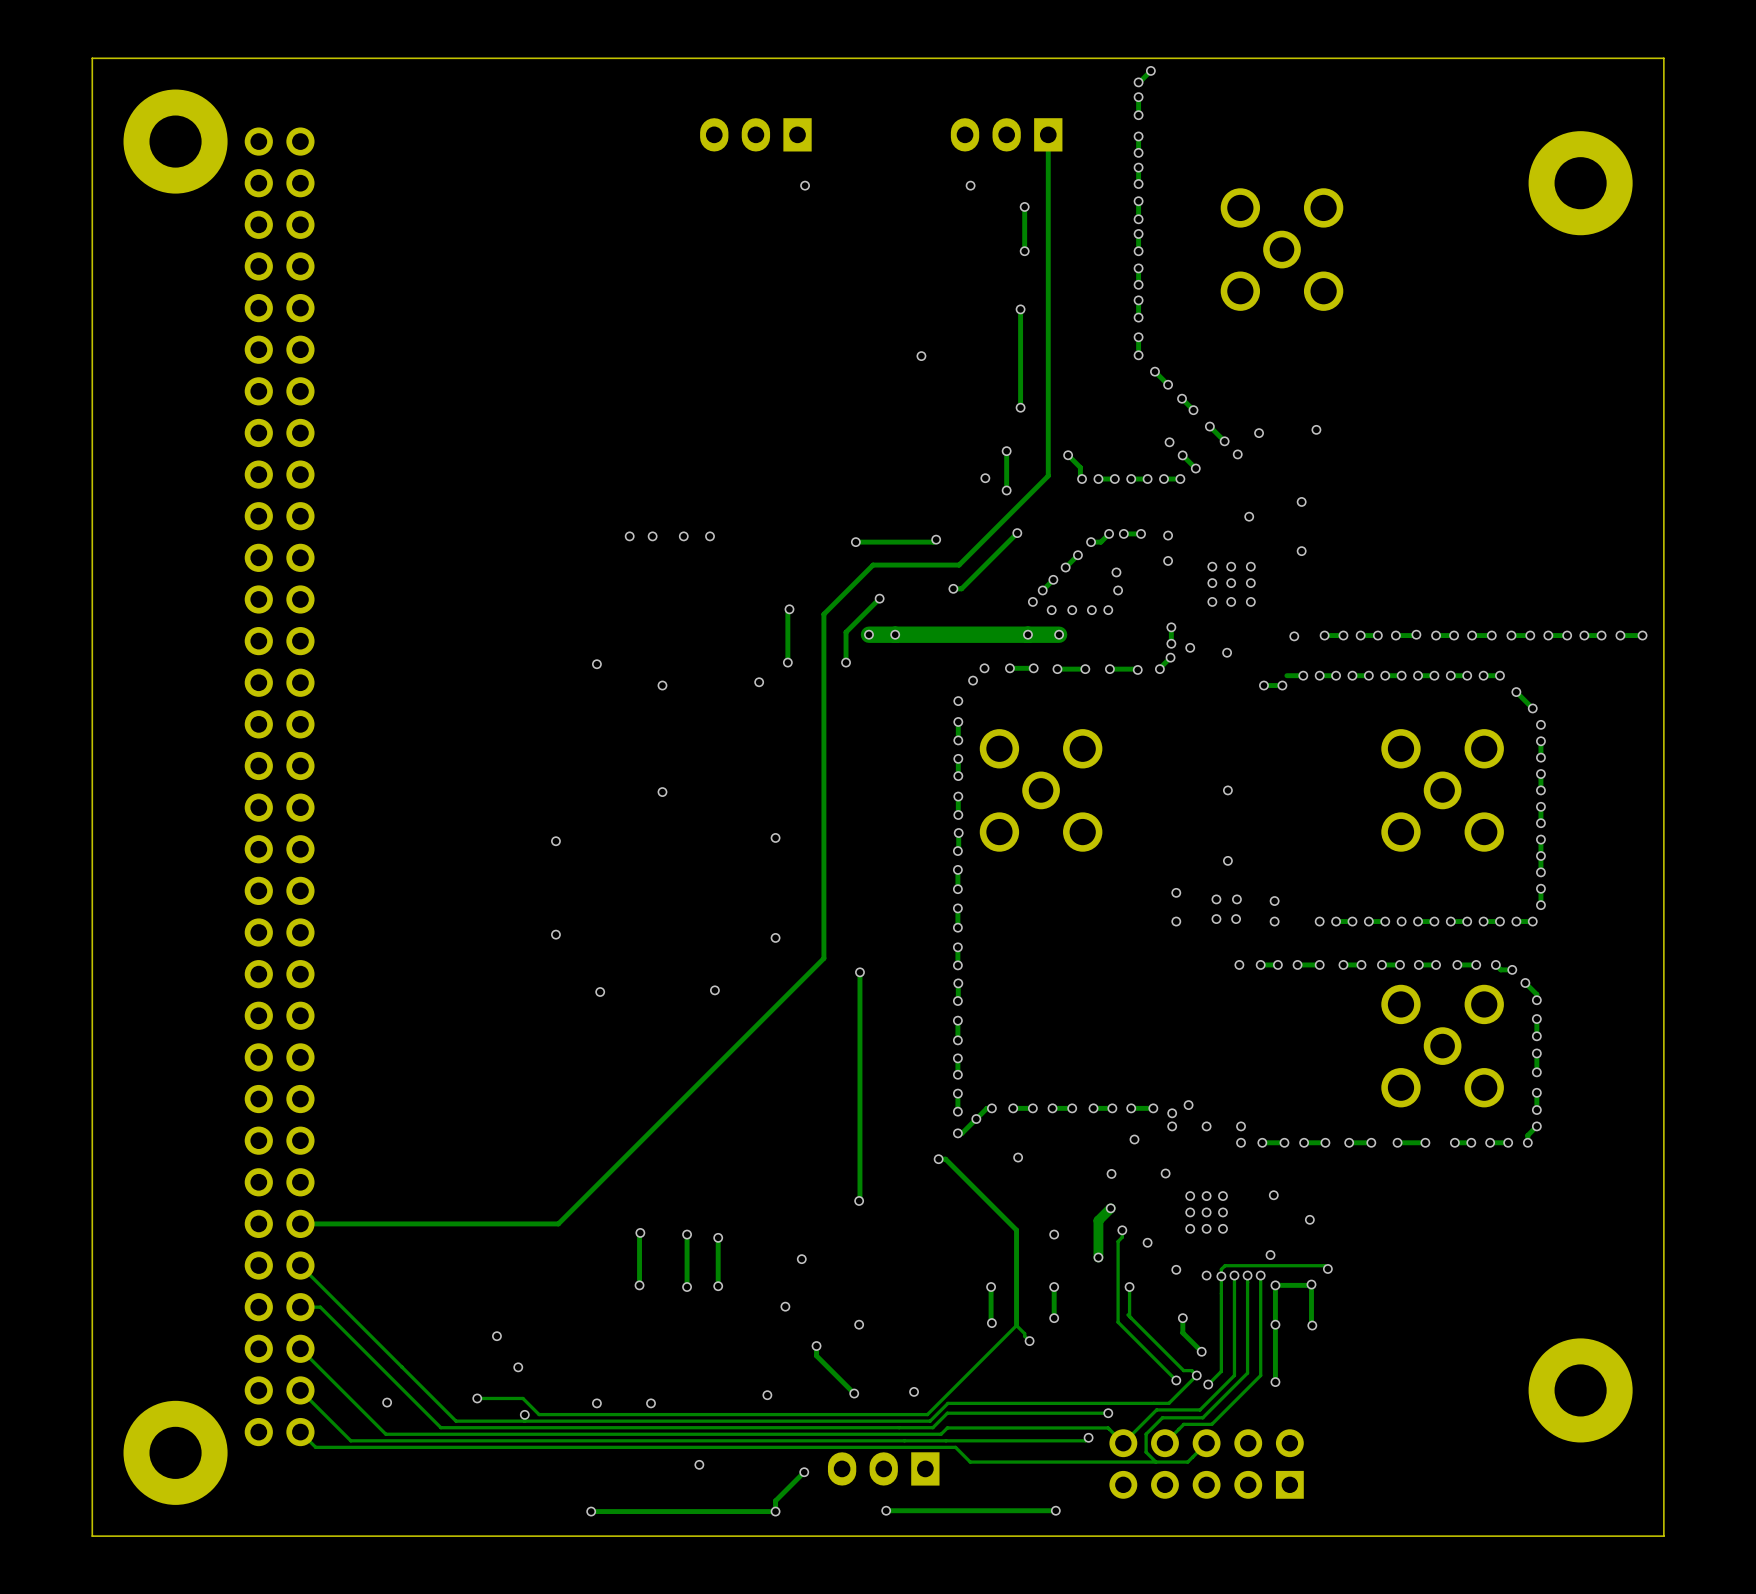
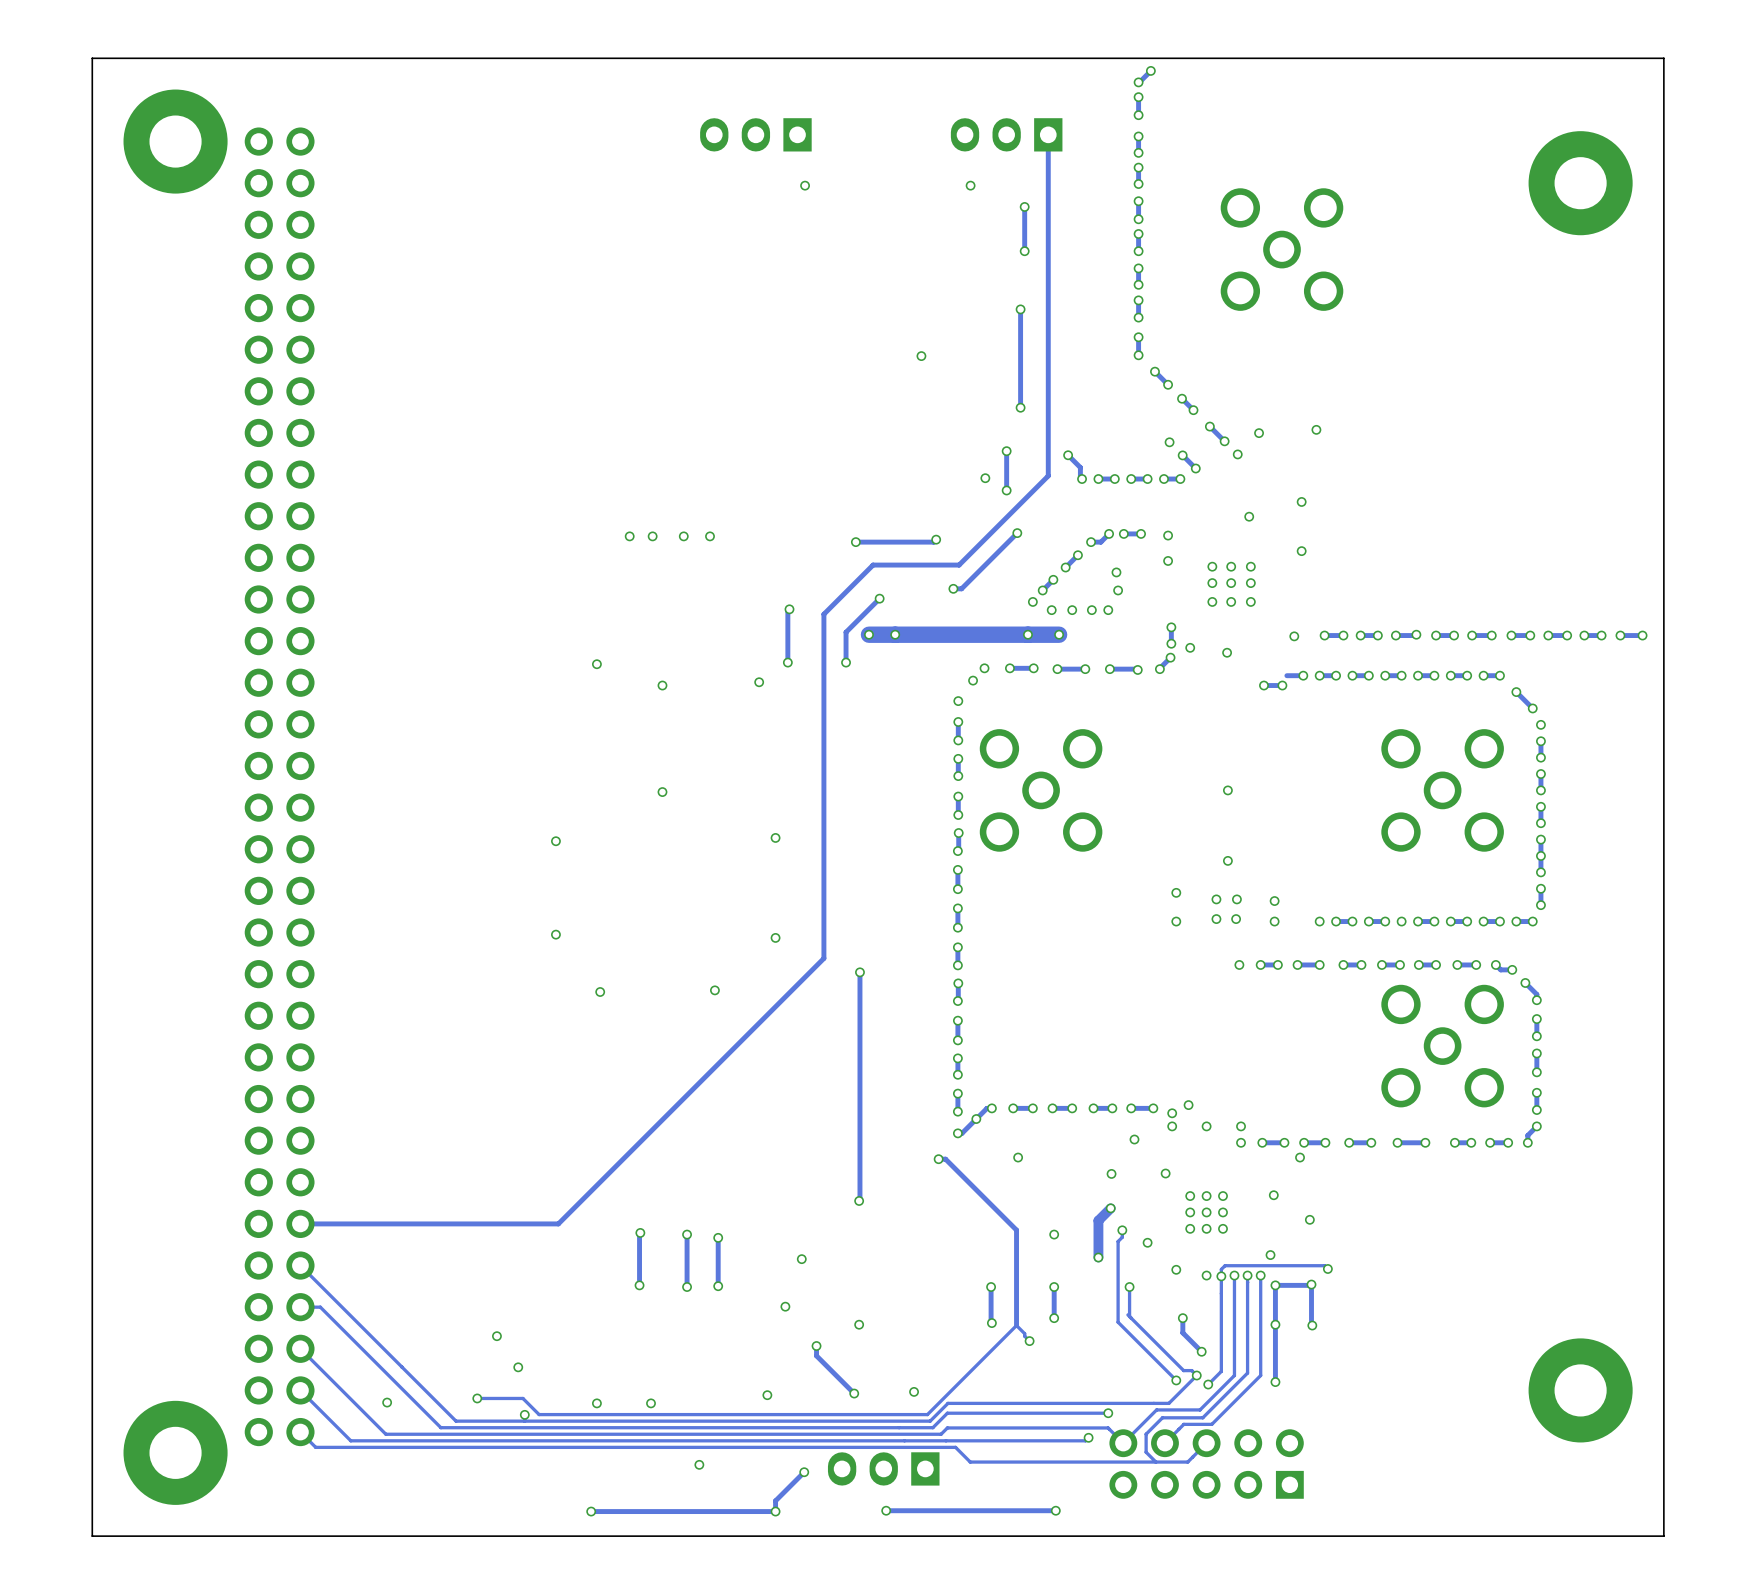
via: none -> (1300, 1157)

